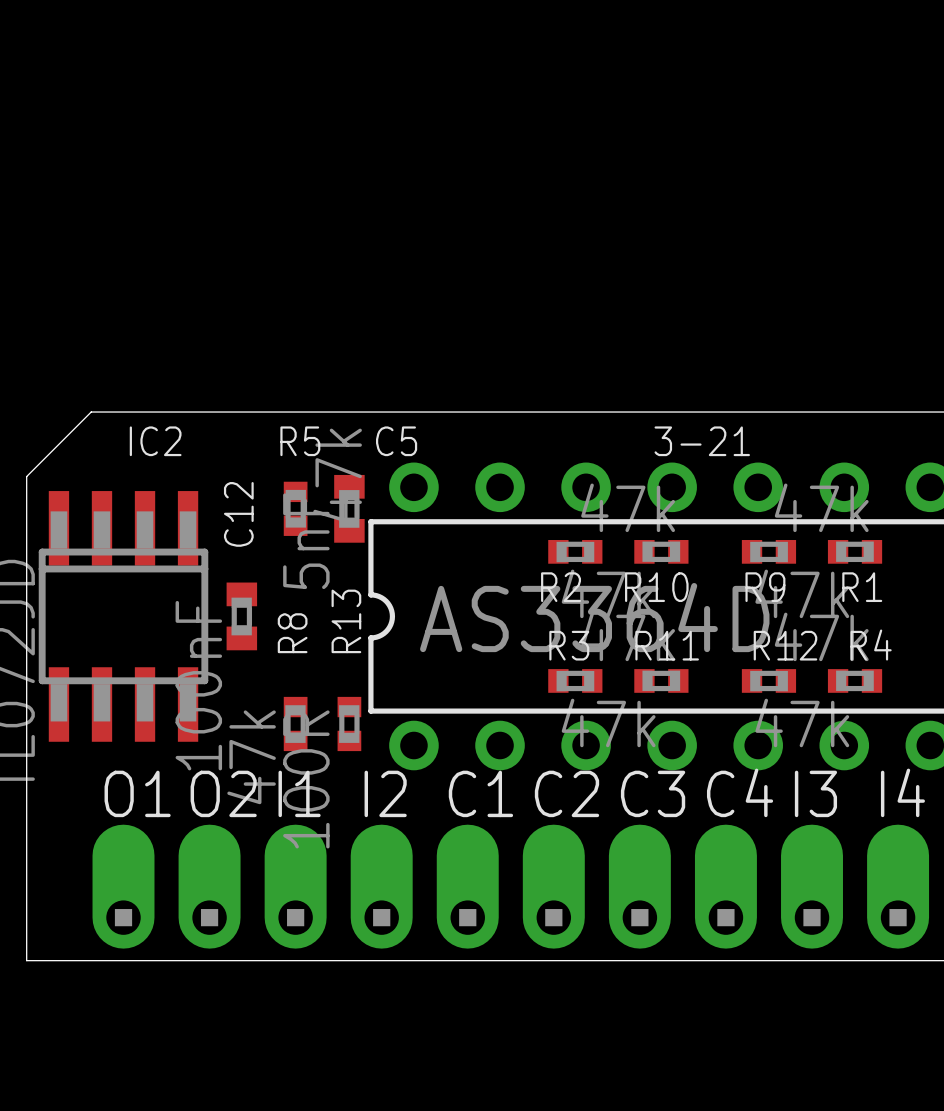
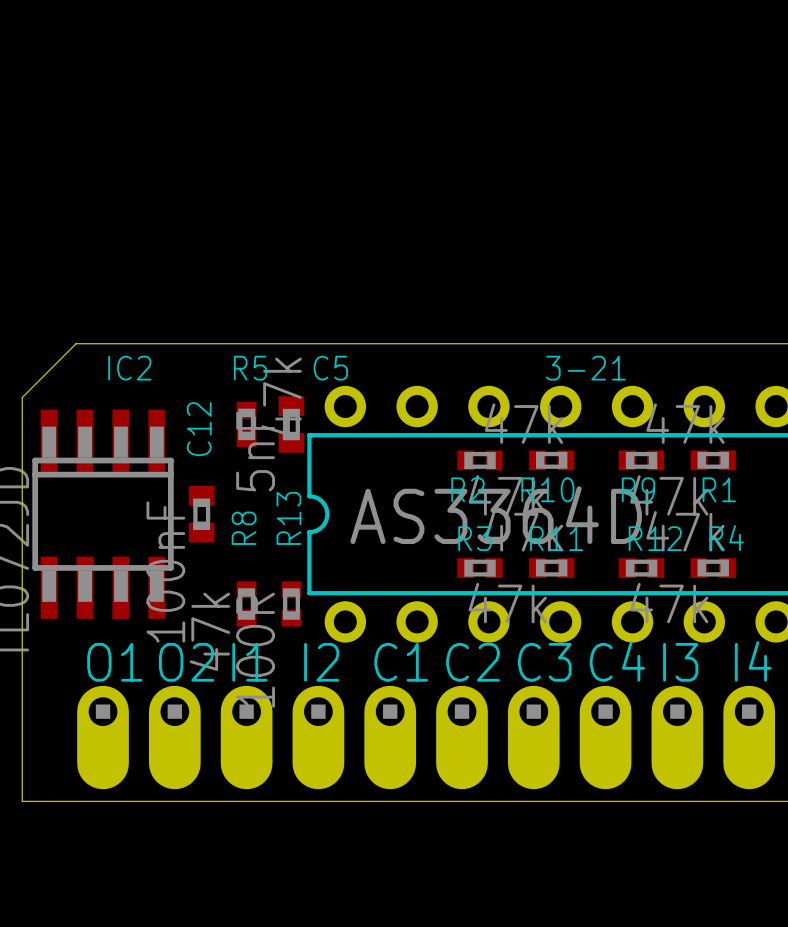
part rotation: 0° (123, 886) -> 180° (103, 737)
part rotation: 0° (209, 886) -> 180° (174, 737)
part rotation: 0° (295, 886) -> 180° (246, 737)
part rotation: 0° (381, 886) -> 180° (318, 737)
part rotation: 0° (467, 886) -> 180° (390, 737)
part rotation: 0° (553, 886) -> 180° (462, 737)
part rotation: 0° (639, 886) -> 180° (533, 737)
part rotation: 0° (725, 886) -> 180° (605, 737)
part rotation: 0° (812, 886) -> 180° (677, 737)
part rotation: 0° (898, 886) -> 180° (749, 737)

